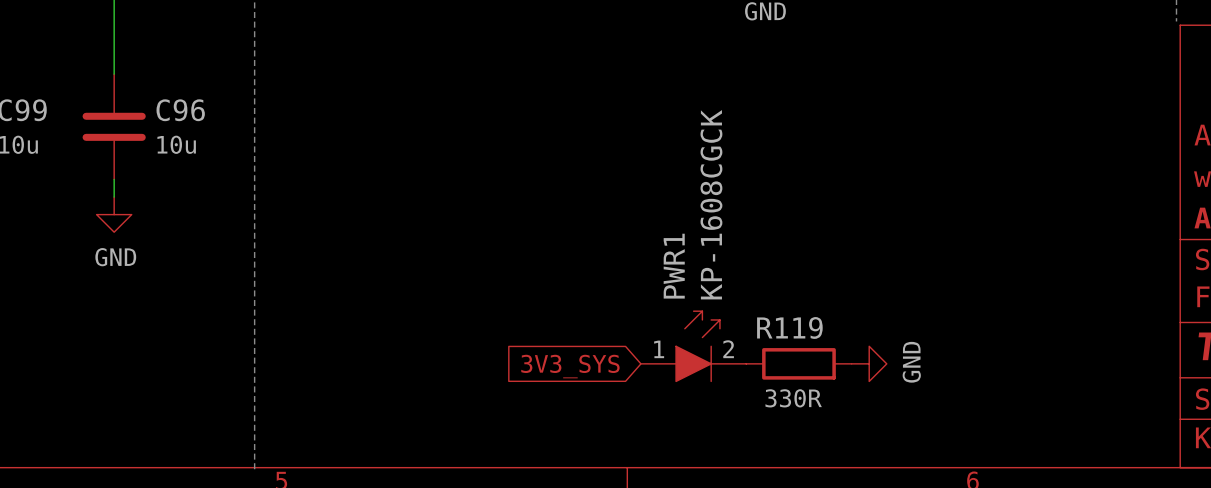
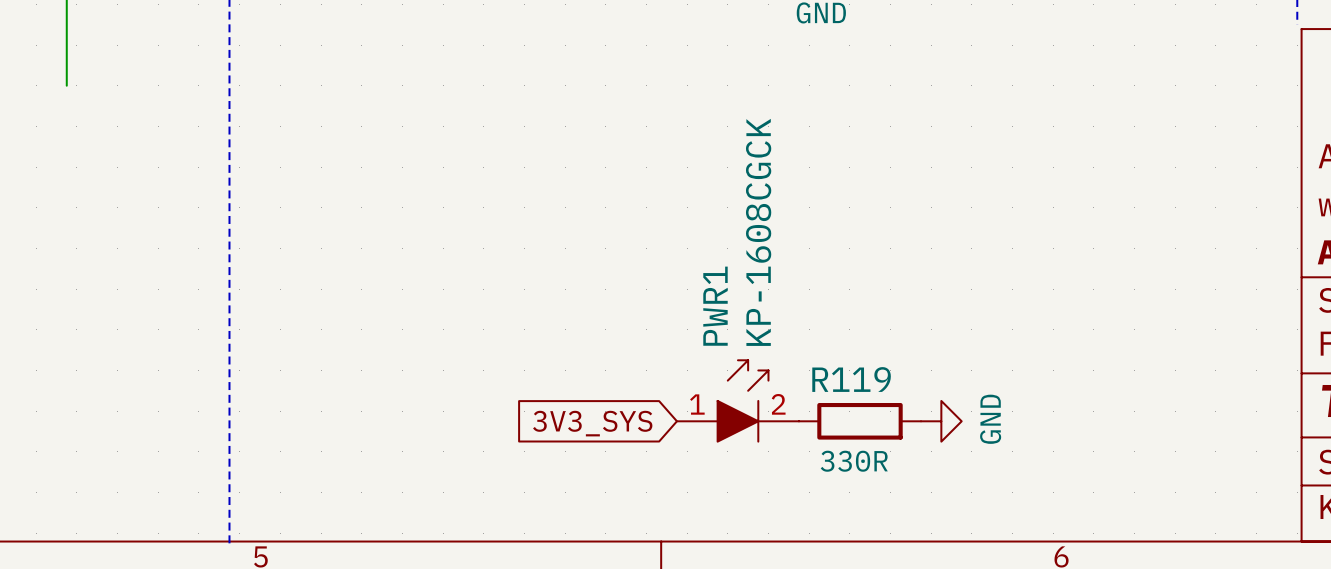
C96: (114, 126) -> none
wire: (114, 179) (114, 197) -> none
power symbol: GND (114, 214) -> none

